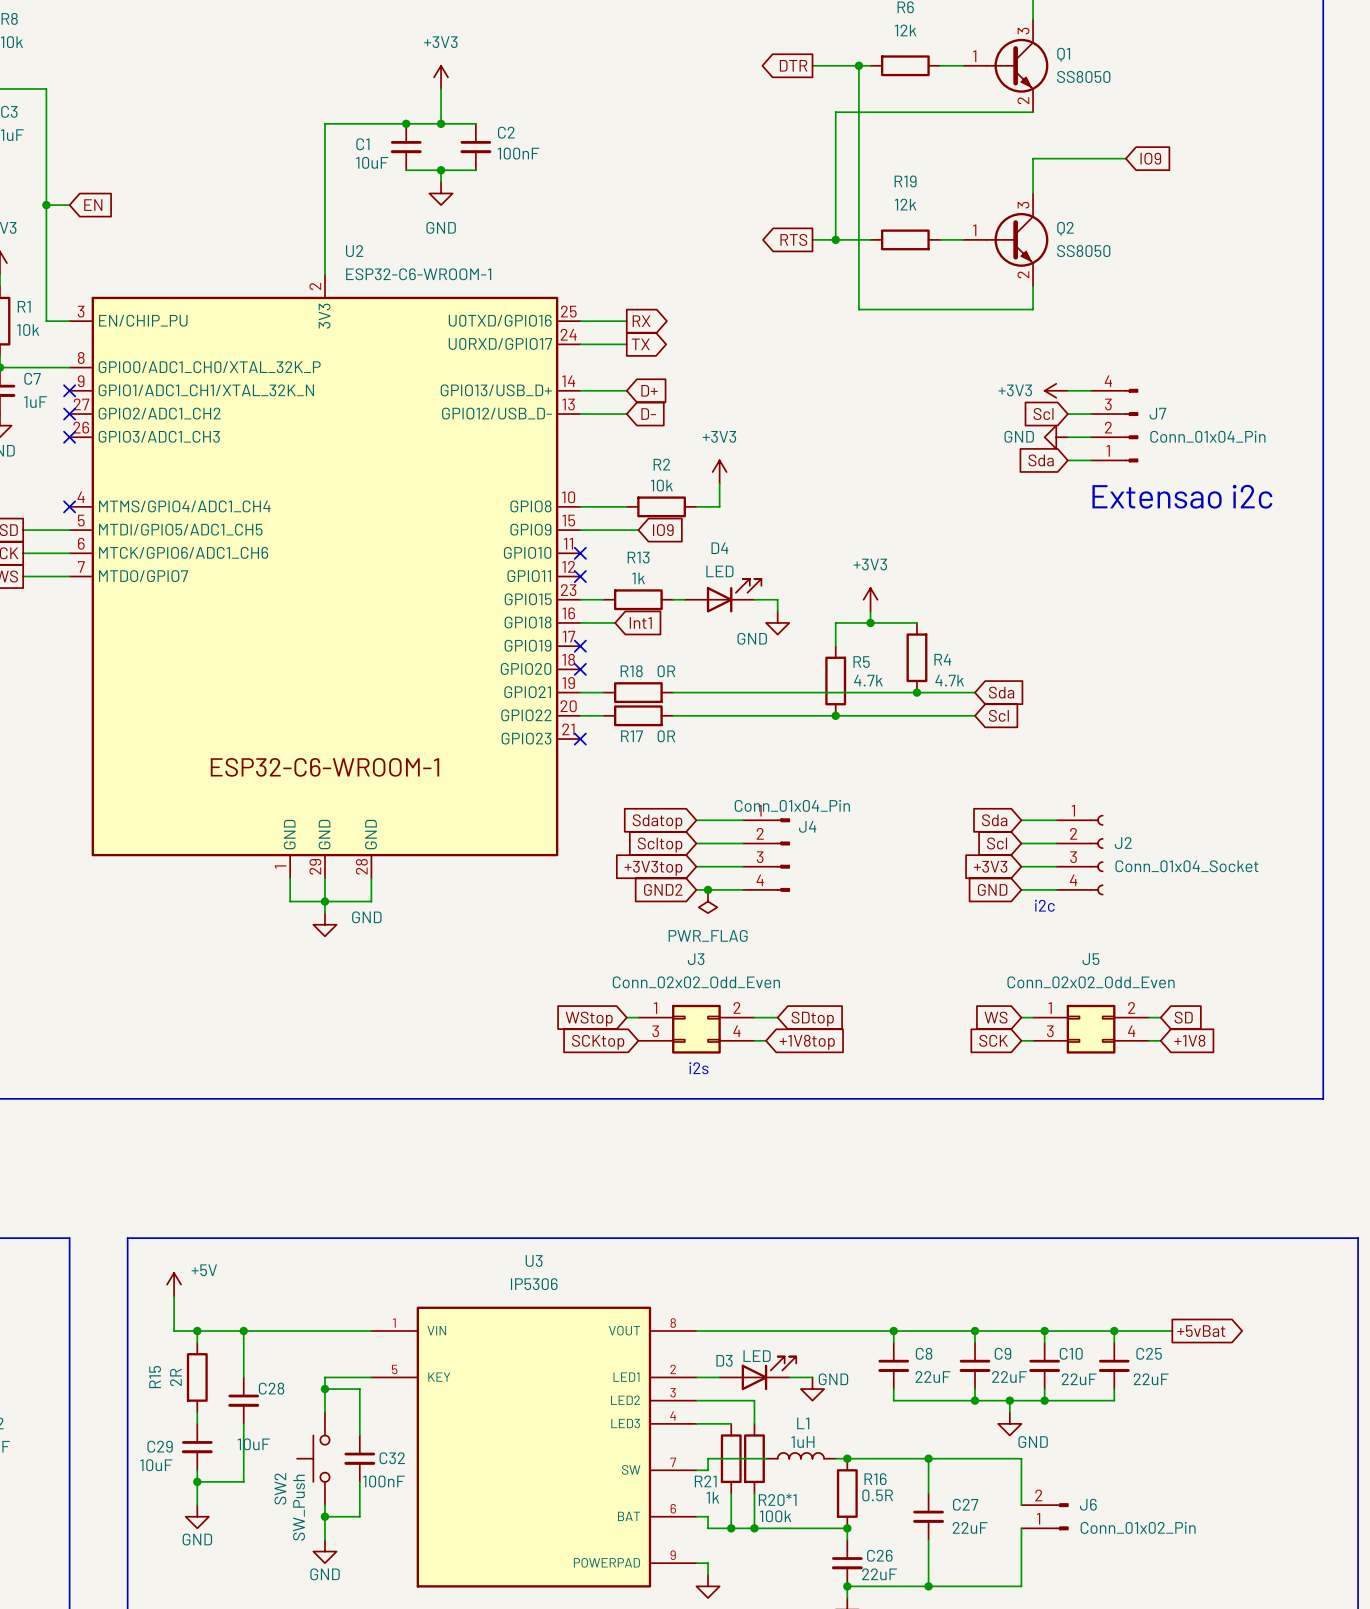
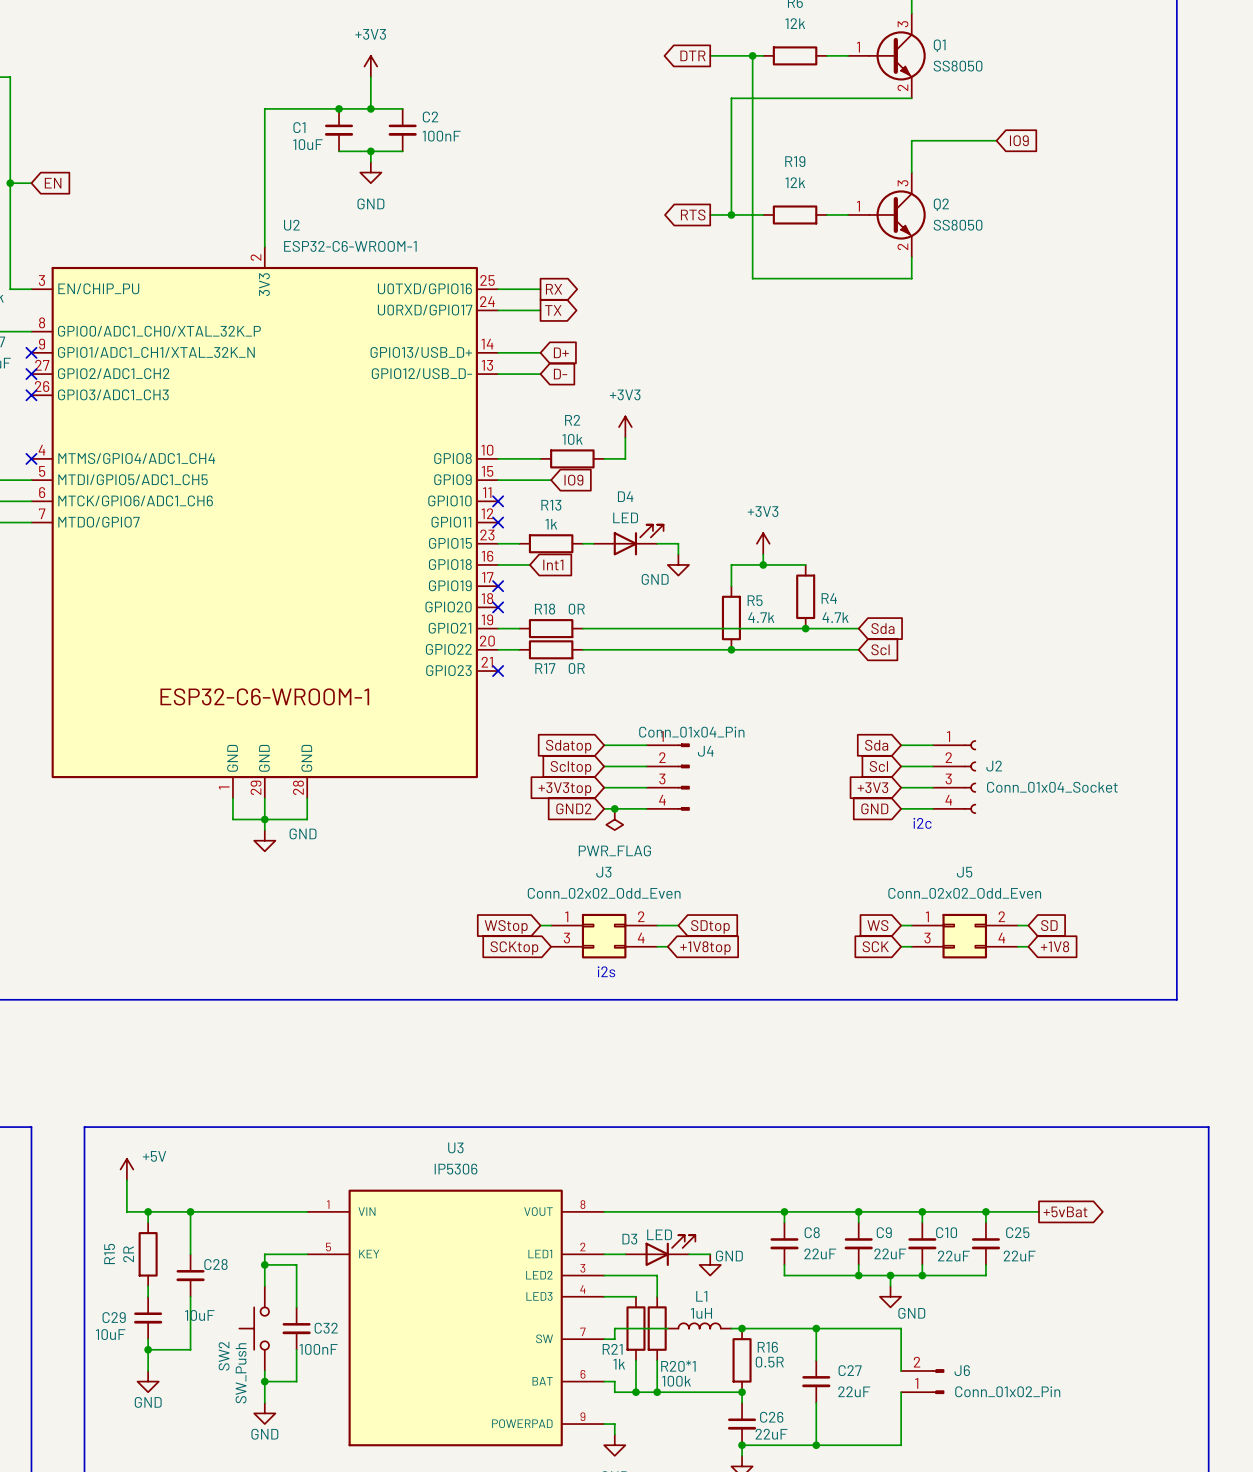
power symbol: +3V3 (1056, 390) -> none
wire: (1067, 390) (1091, 390) -> none
global label: Scl (1043, 414) -> none
wire: (1067, 414) (1091, 414) -> none
J7: Conn_01x04_Pin (1114, 425) -> none
power symbol: GND (1056, 437) -> none
wire: (1067, 437) (1091, 437) -> none
global label: Sda (1041, 460) -> none
wire: (1067, 460) (1091, 460) -> none
text: Extensao i2c (1182, 496) -> none

